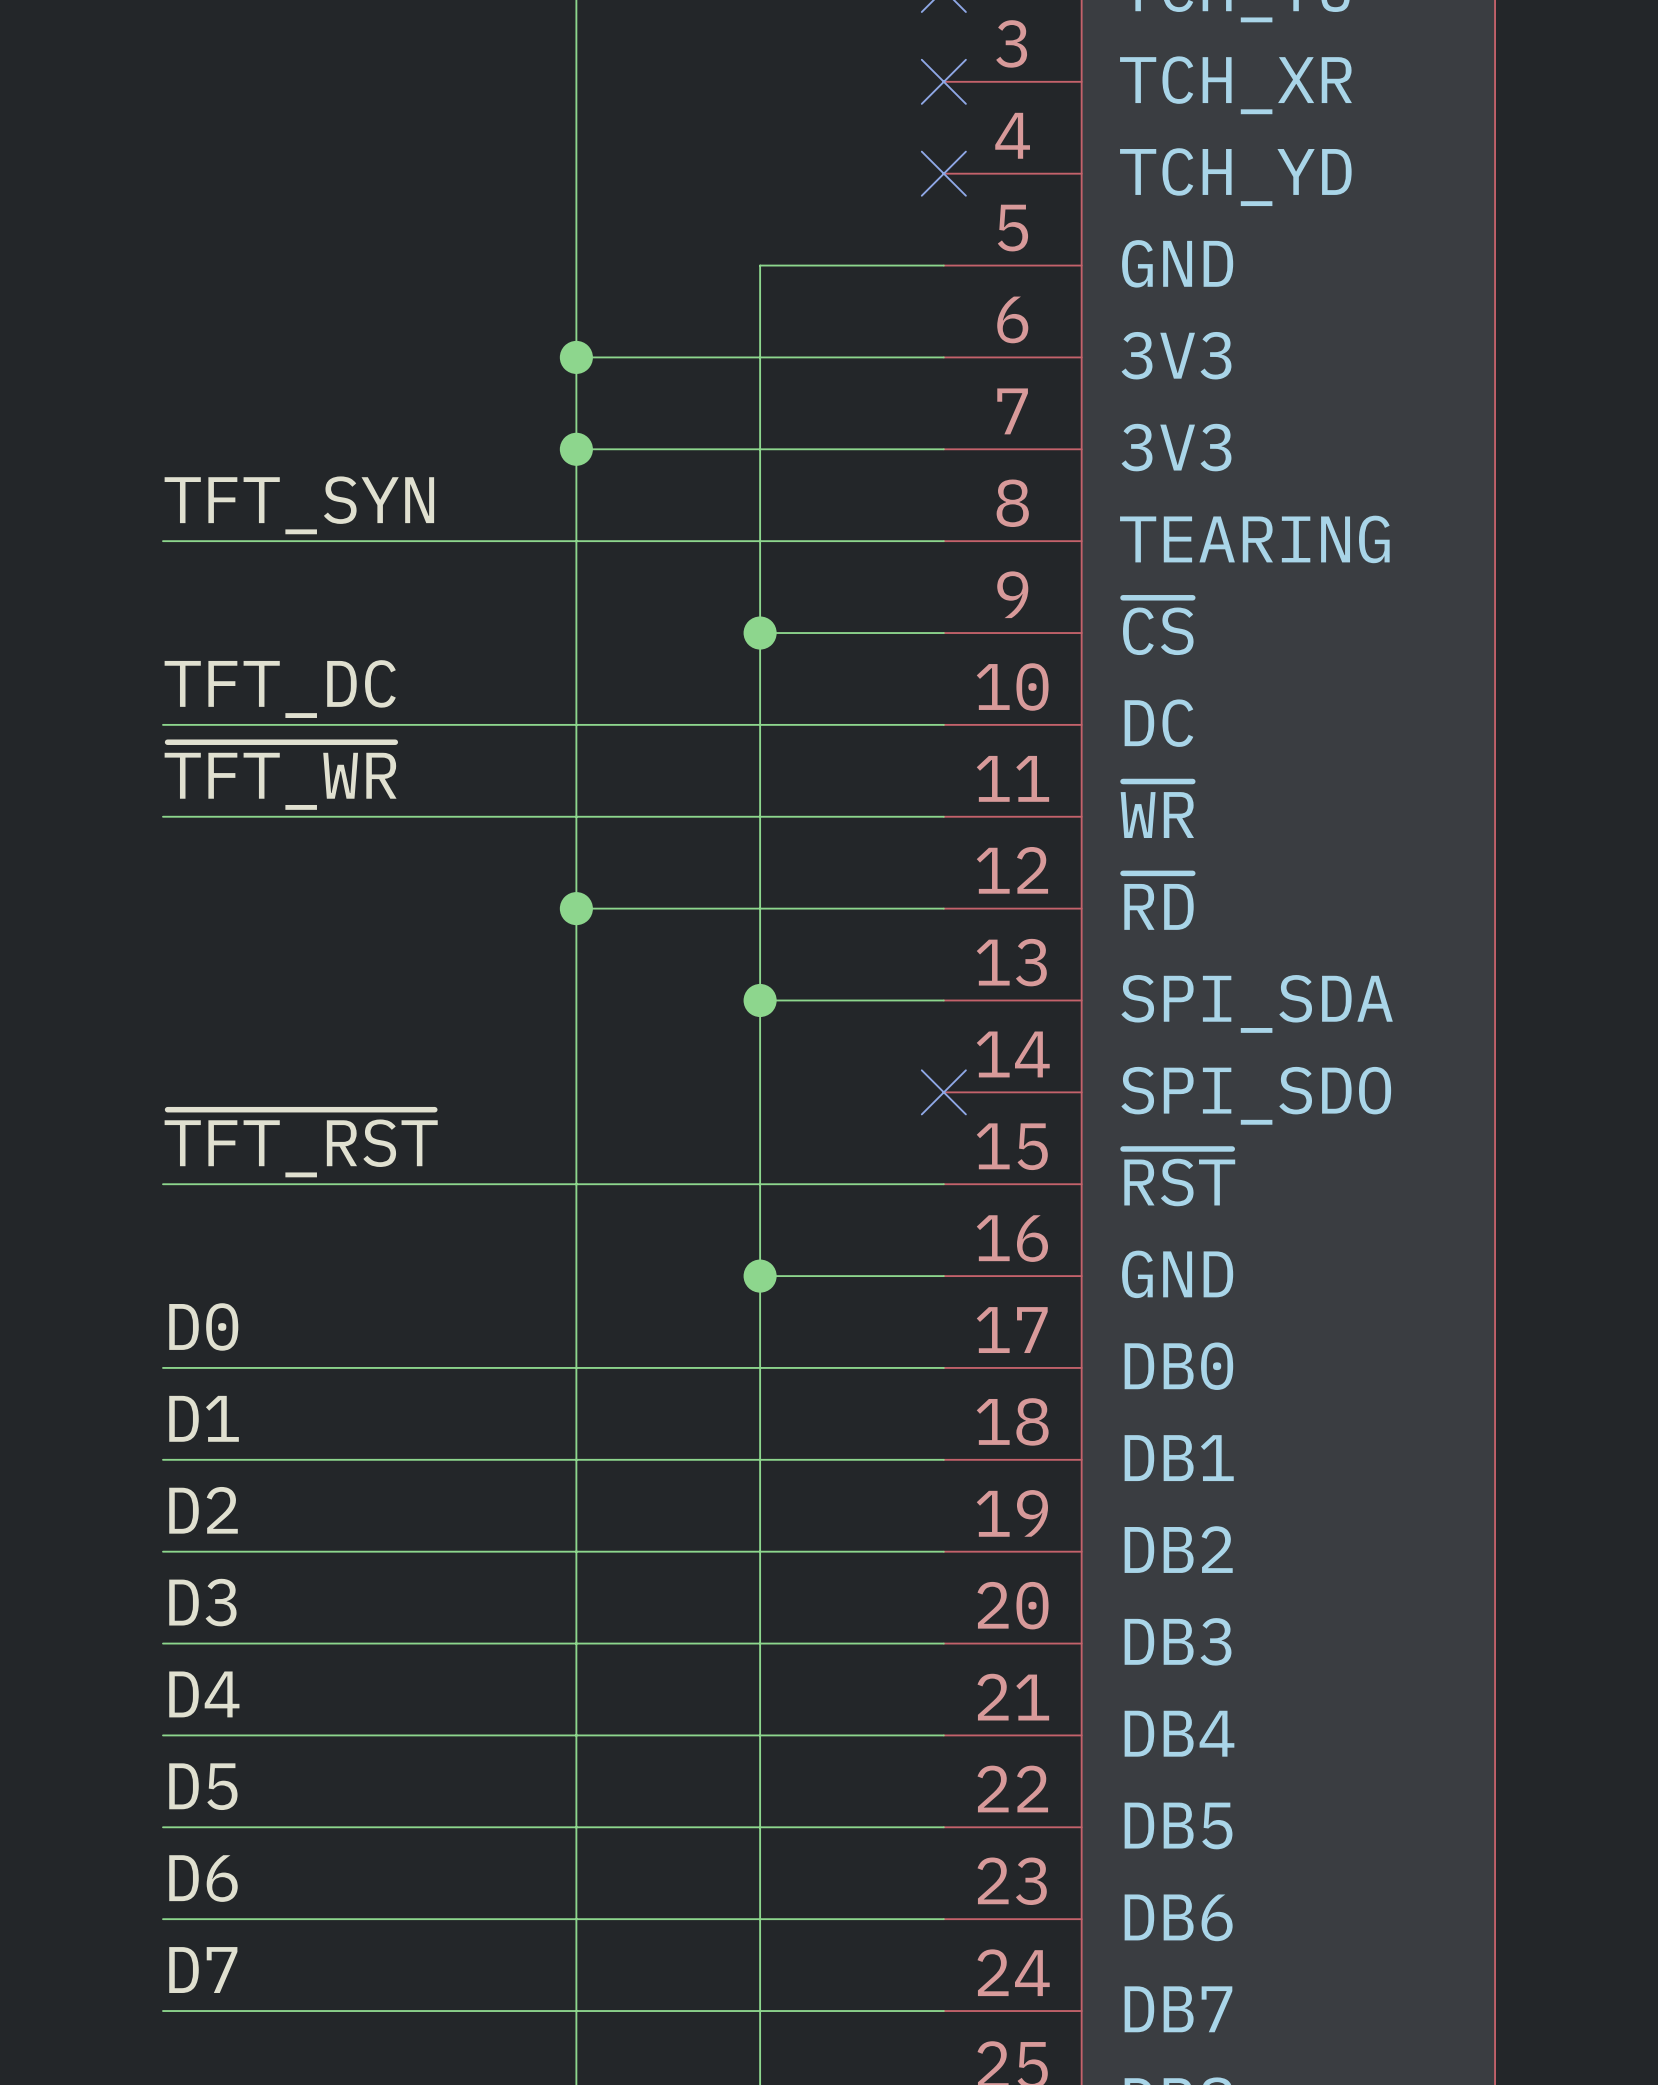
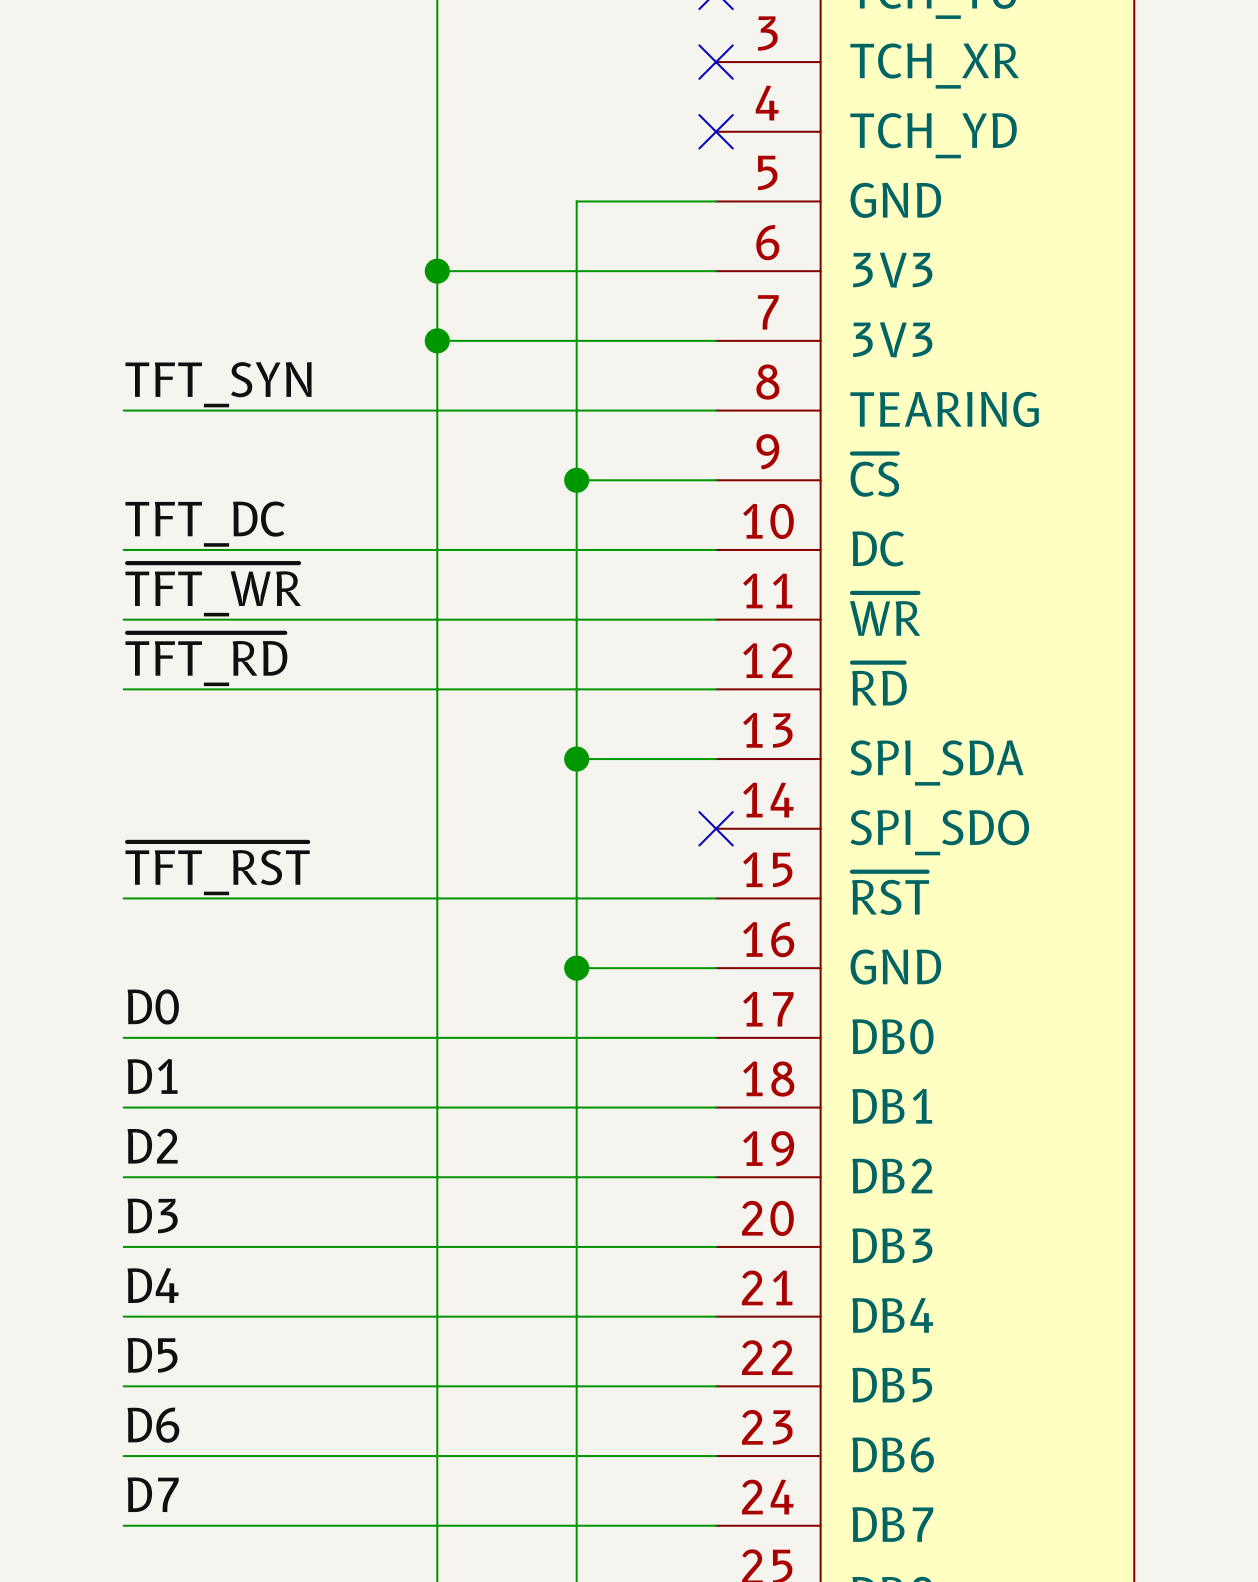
label: none -> ~{TFT_RD} (206, 659)
wire: none -> (123, 689) (437, 689)
junction: (576, 908) -> none

